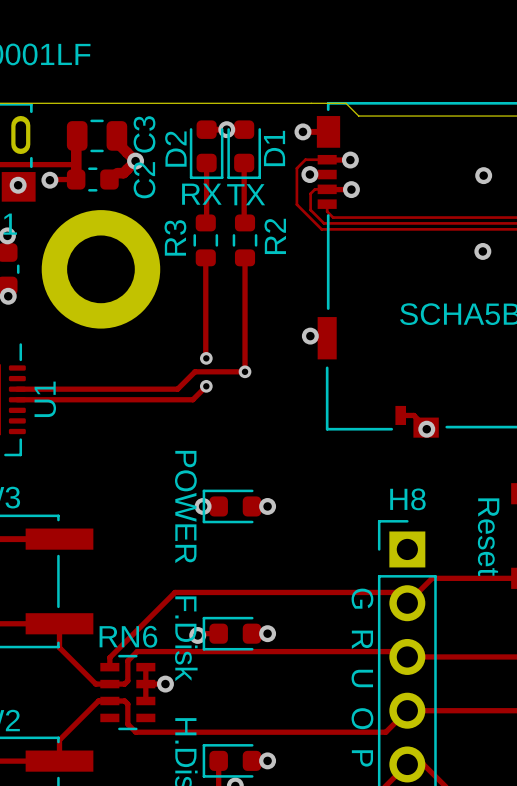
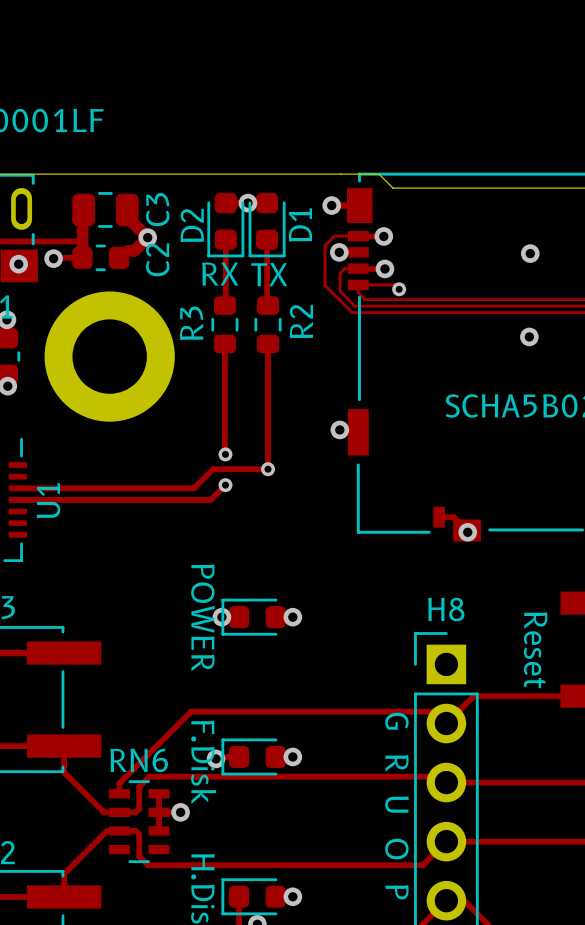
track: none -> (358, 284) (394, 284) (399, 289)
via: none -> (399, 289)

